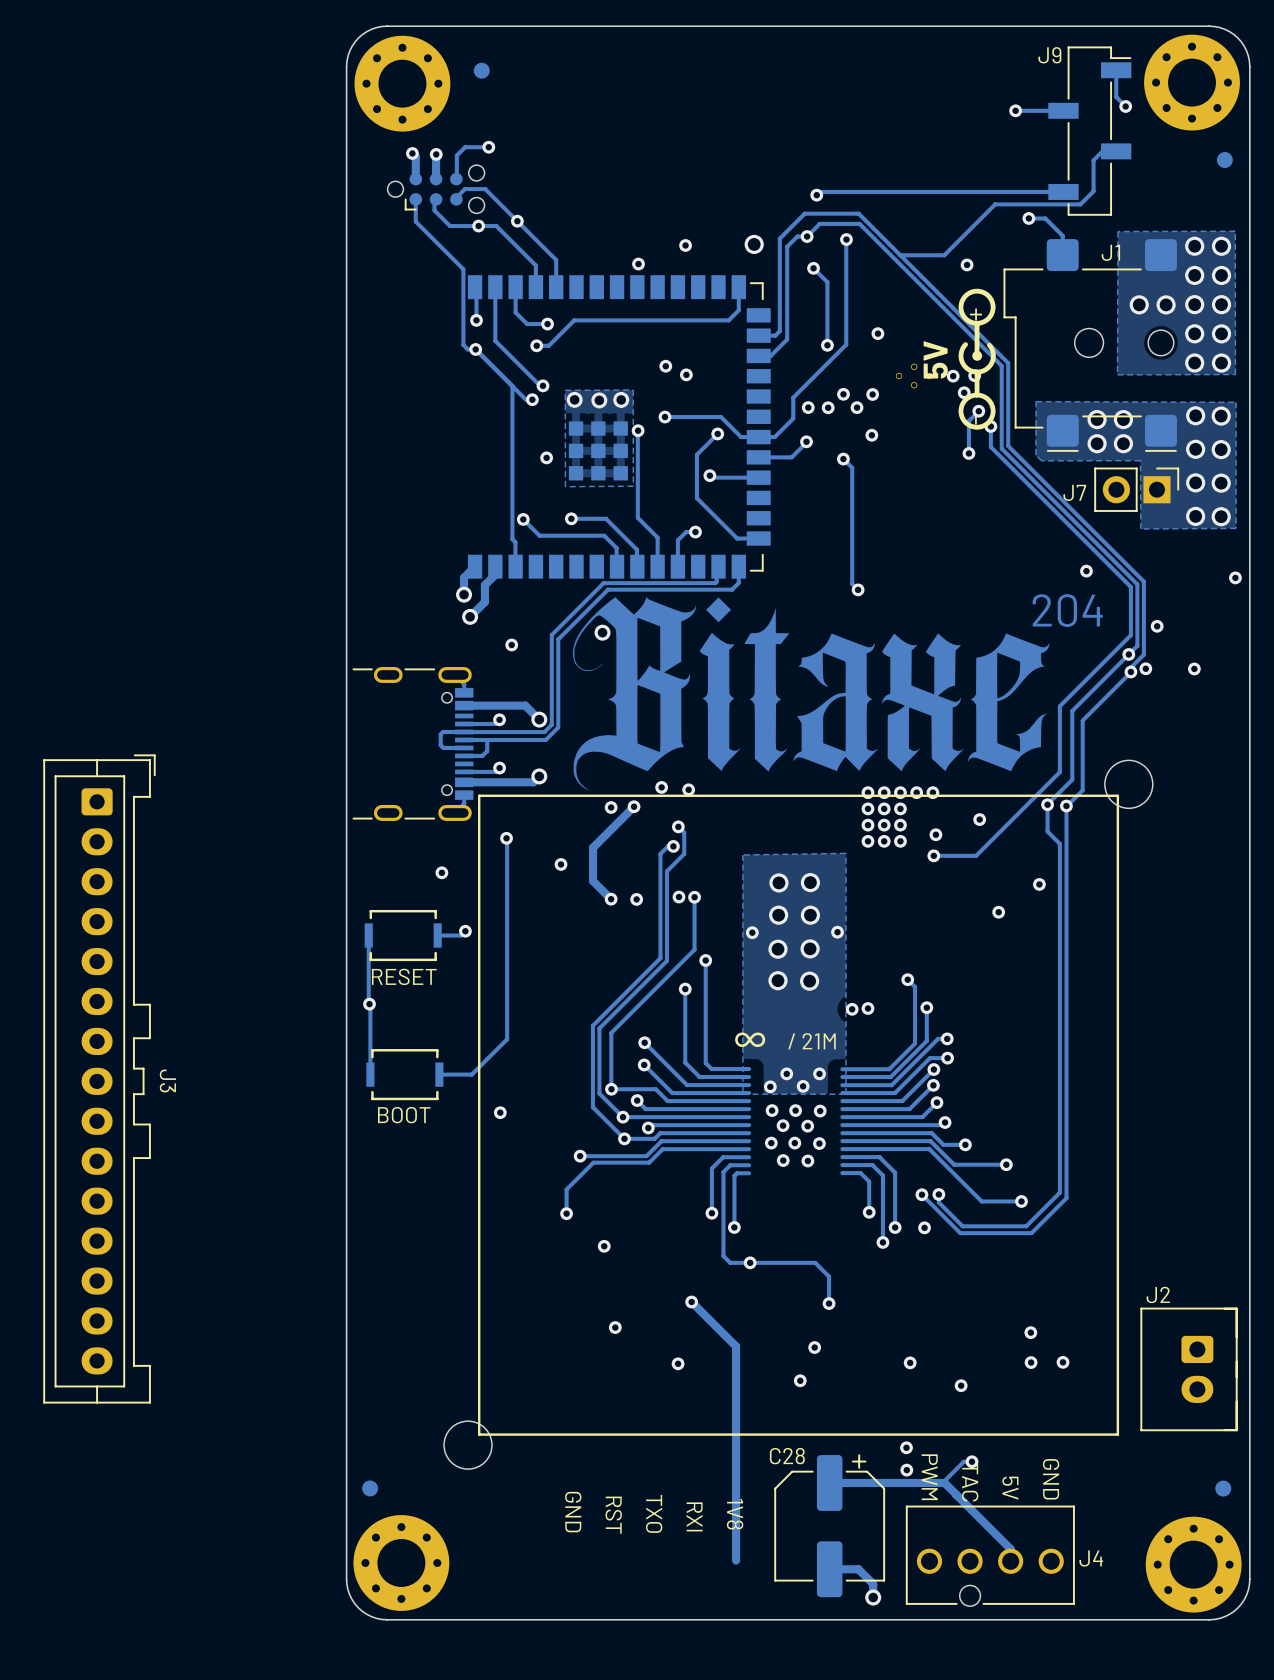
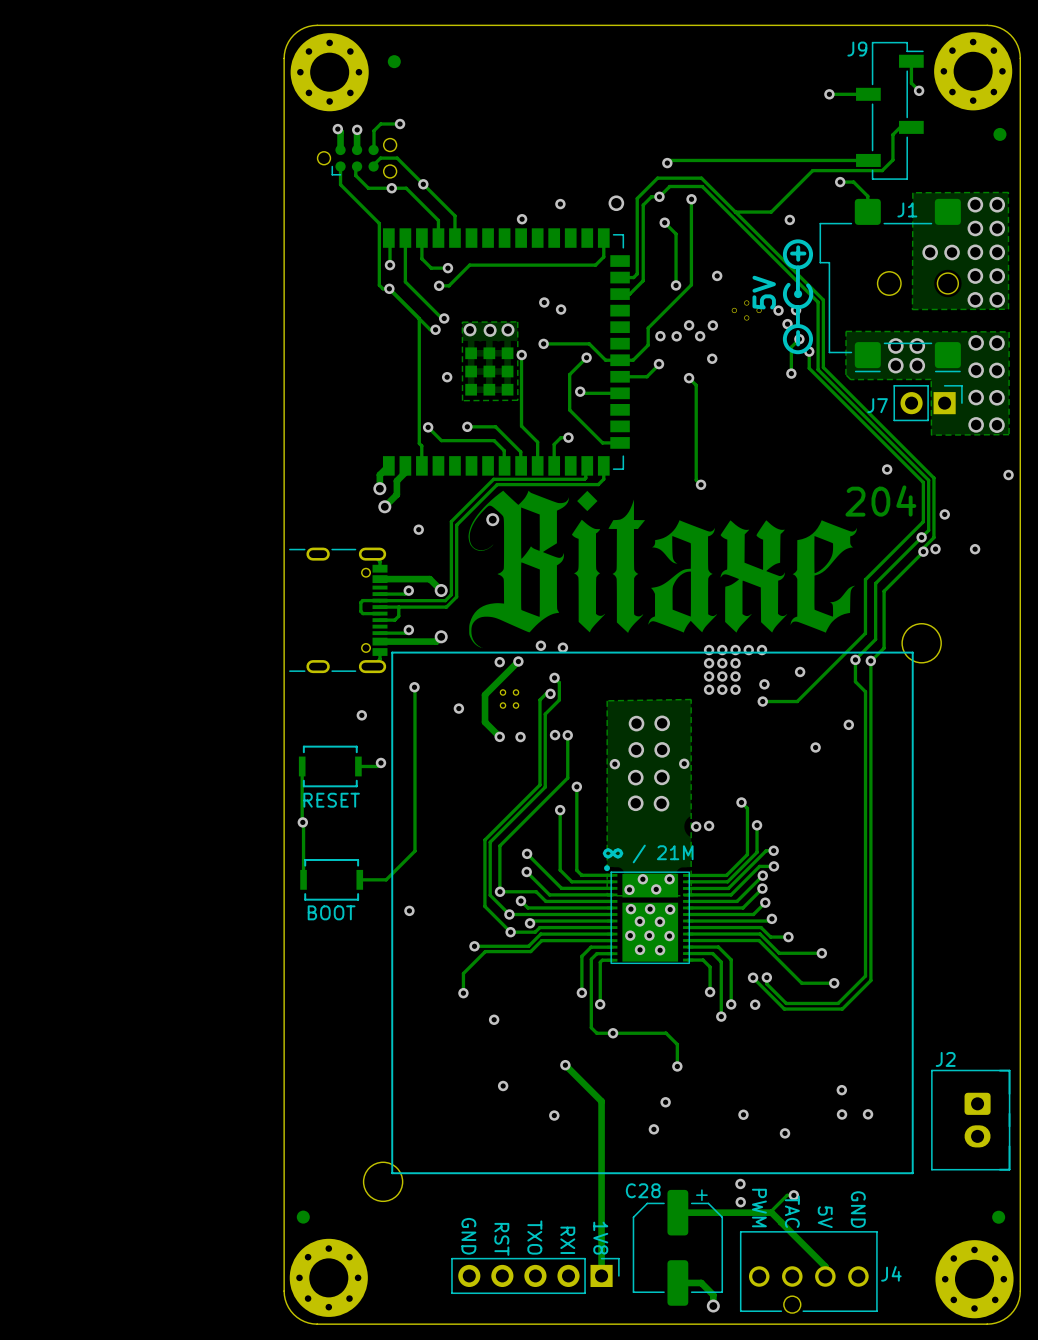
part: none -> (509, 699)
J3: (99, 1078) -> none
part: none -> (648, 914)
part: none -> (535, 1275)

